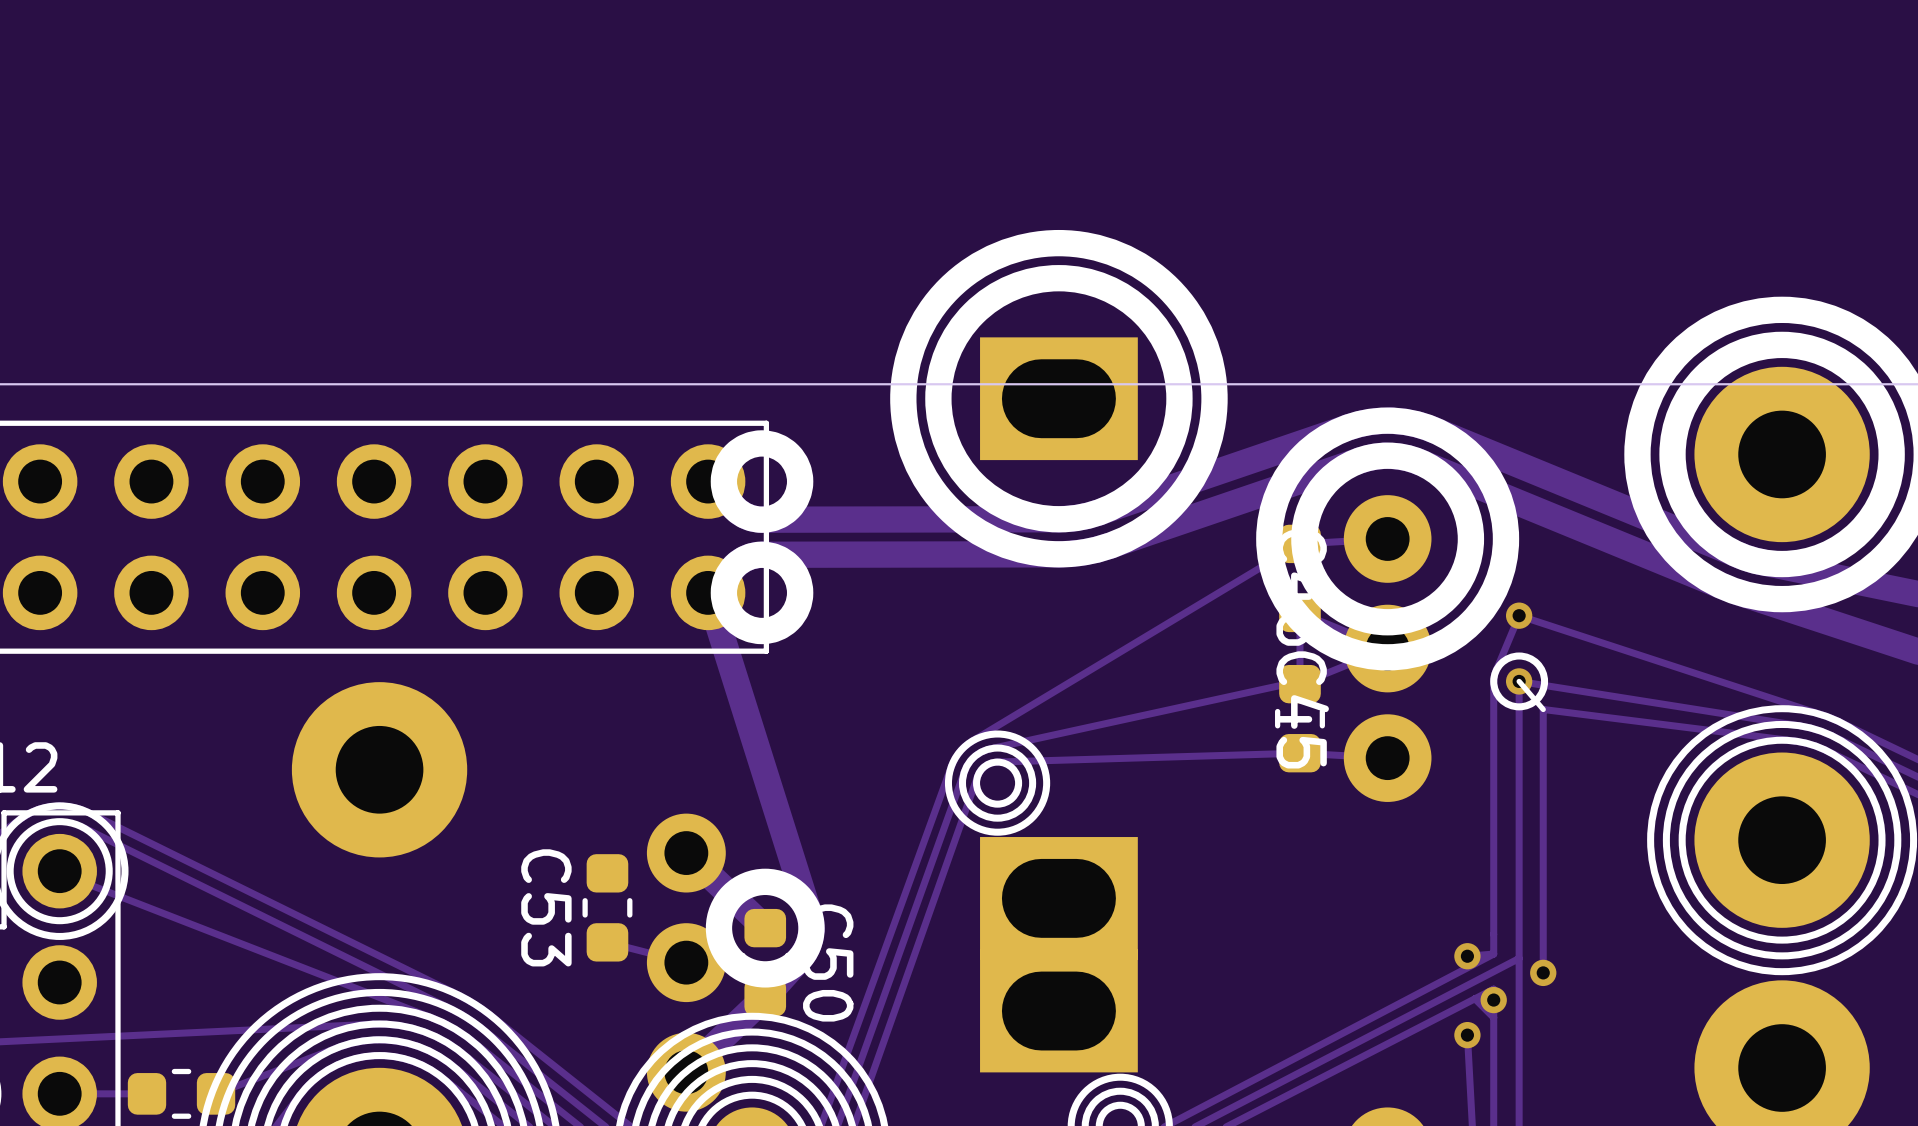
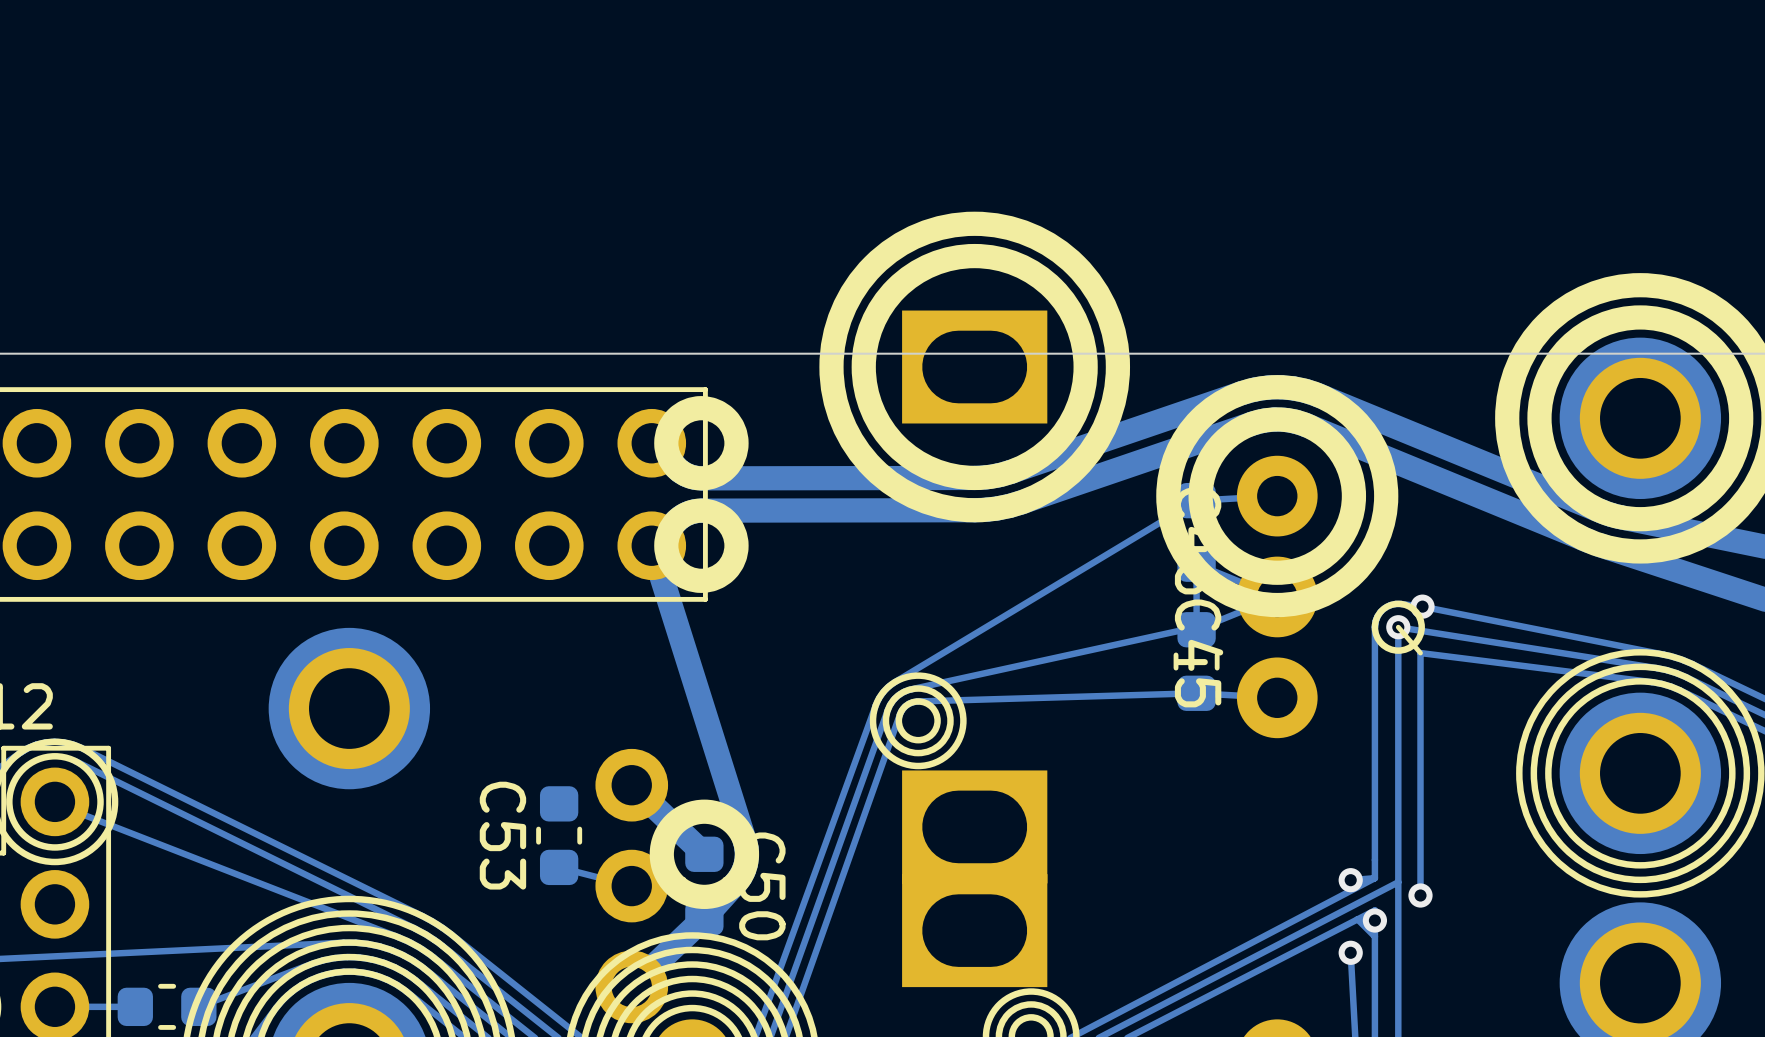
via position: (1519, 615) -> (1422, 606)
track: (1495, 671) (1519, 615) (1838, 721) -> (1374, 627) (1380, 611) (1390, 605) (1401, 604) (1663, 654) (1692, 664)

